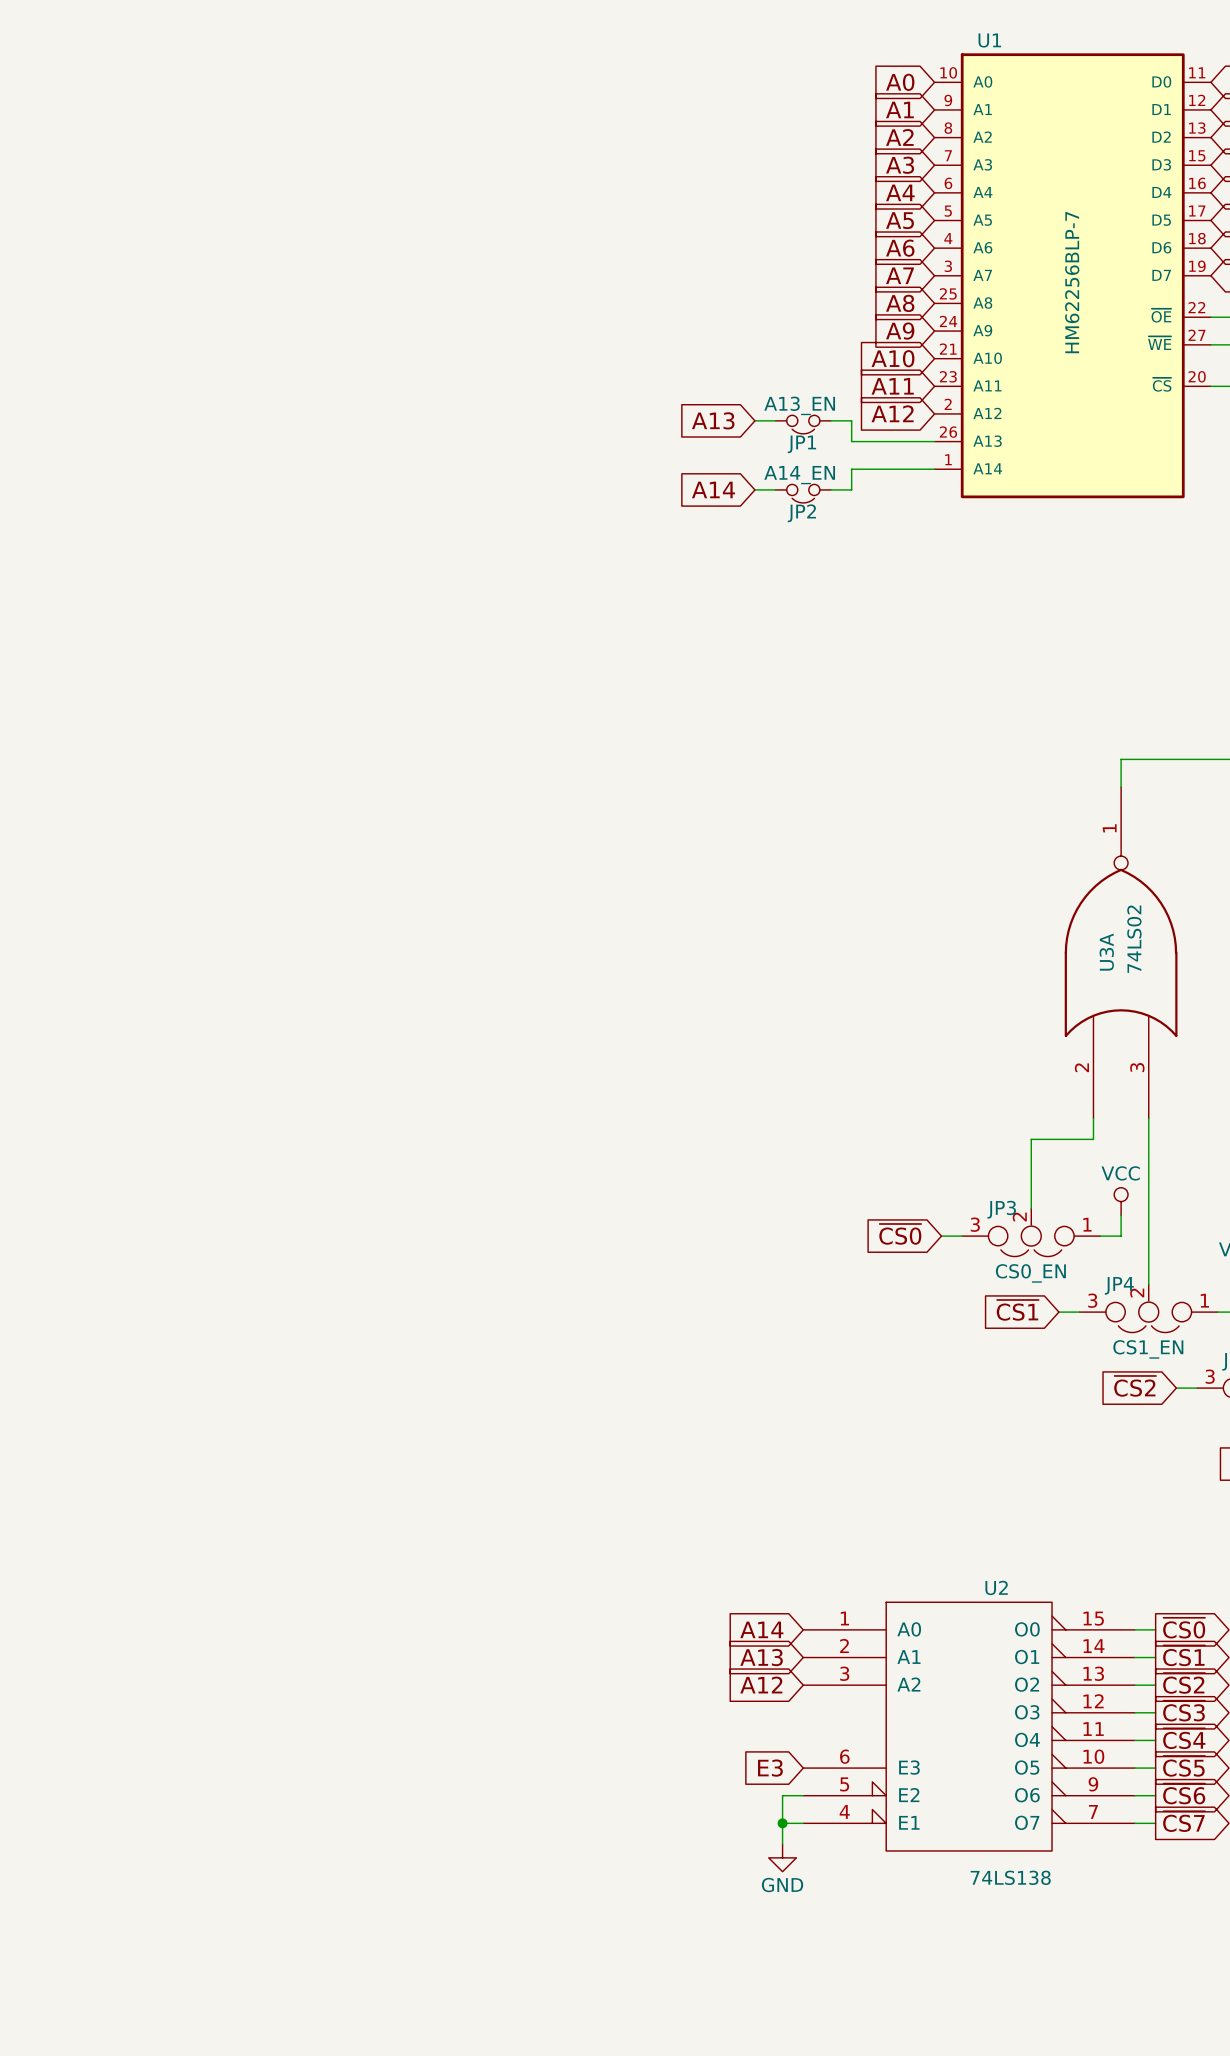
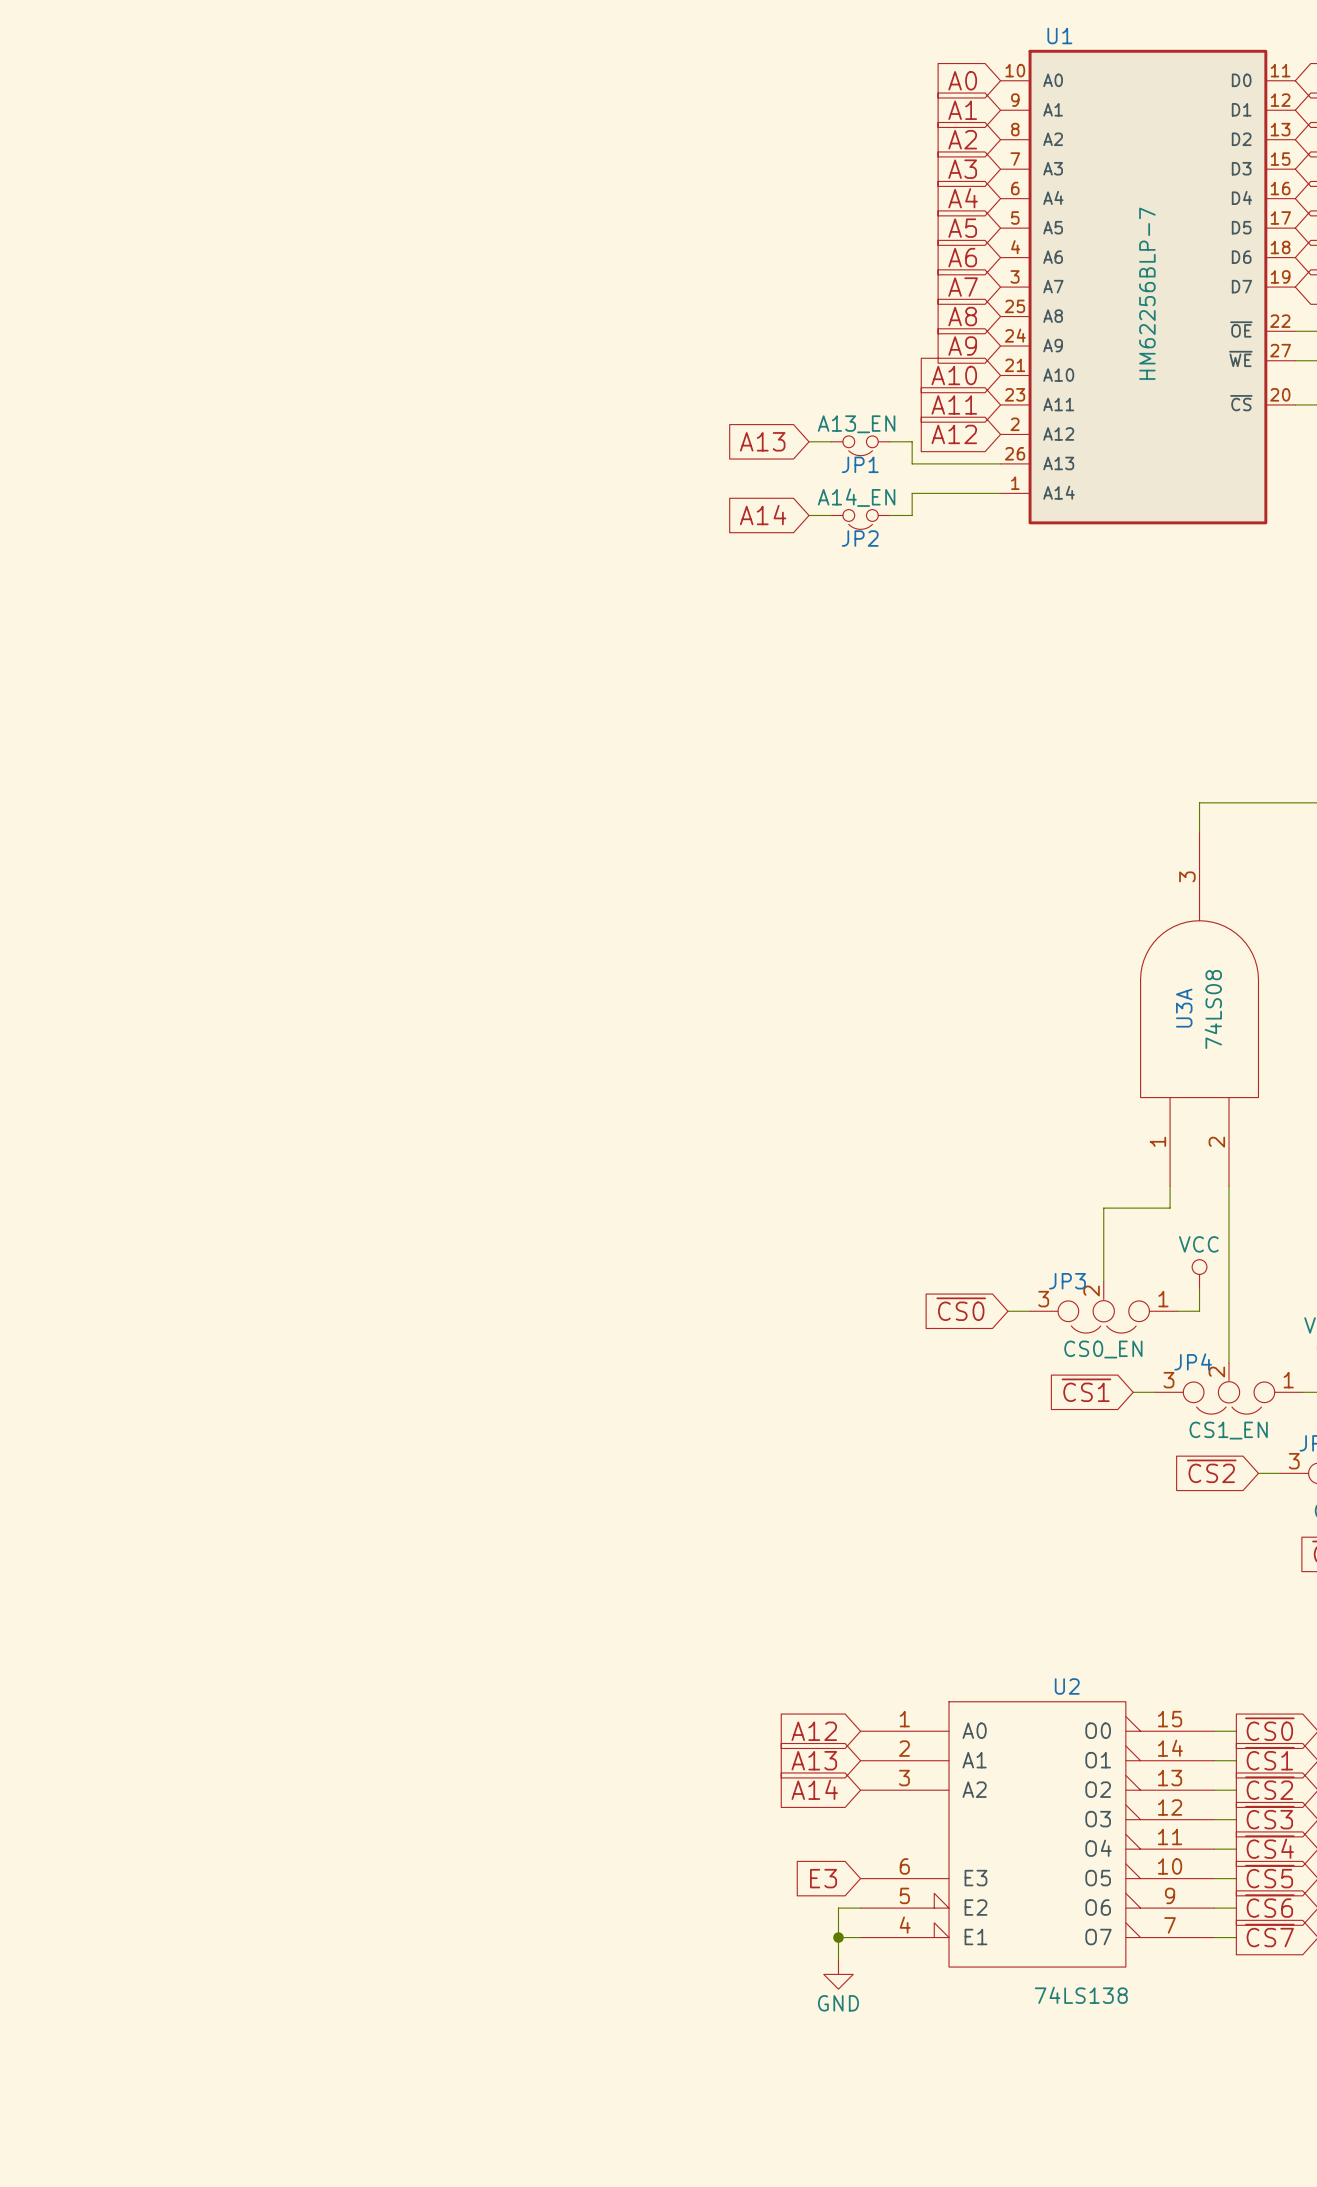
U3A symbol: [1064, 787, 1178, 1119] -> [1140, 832, 1259, 1187]
U3A value: 74LS02 (1134, 939) -> 74LS08 (1213, 1009)
global label: A14 (761, 1629) -> A12 (814, 1731)
global label: A12 (761, 1685) -> A14 (814, 1789)

